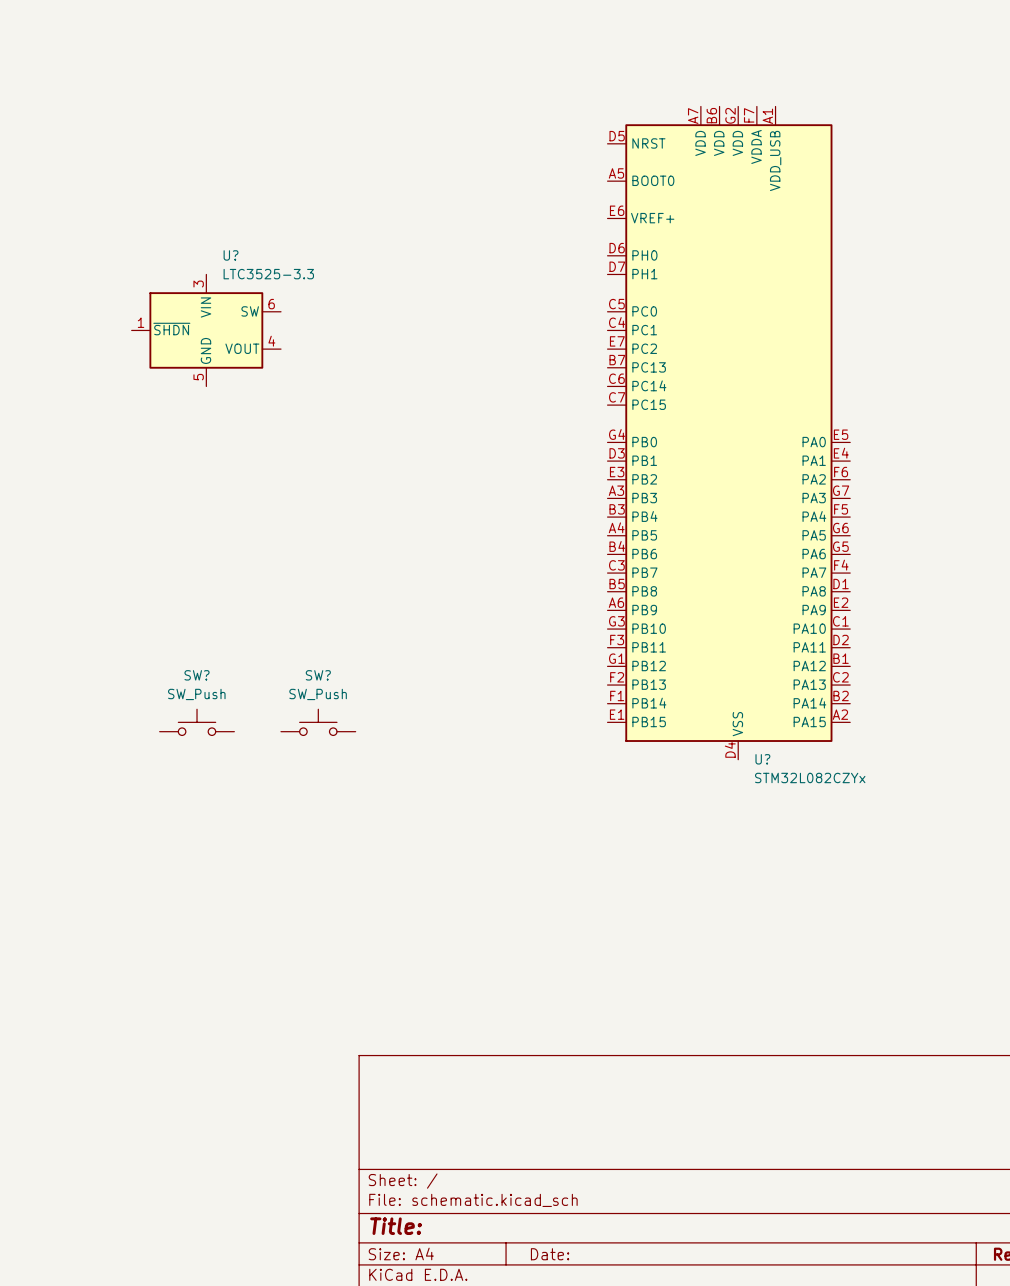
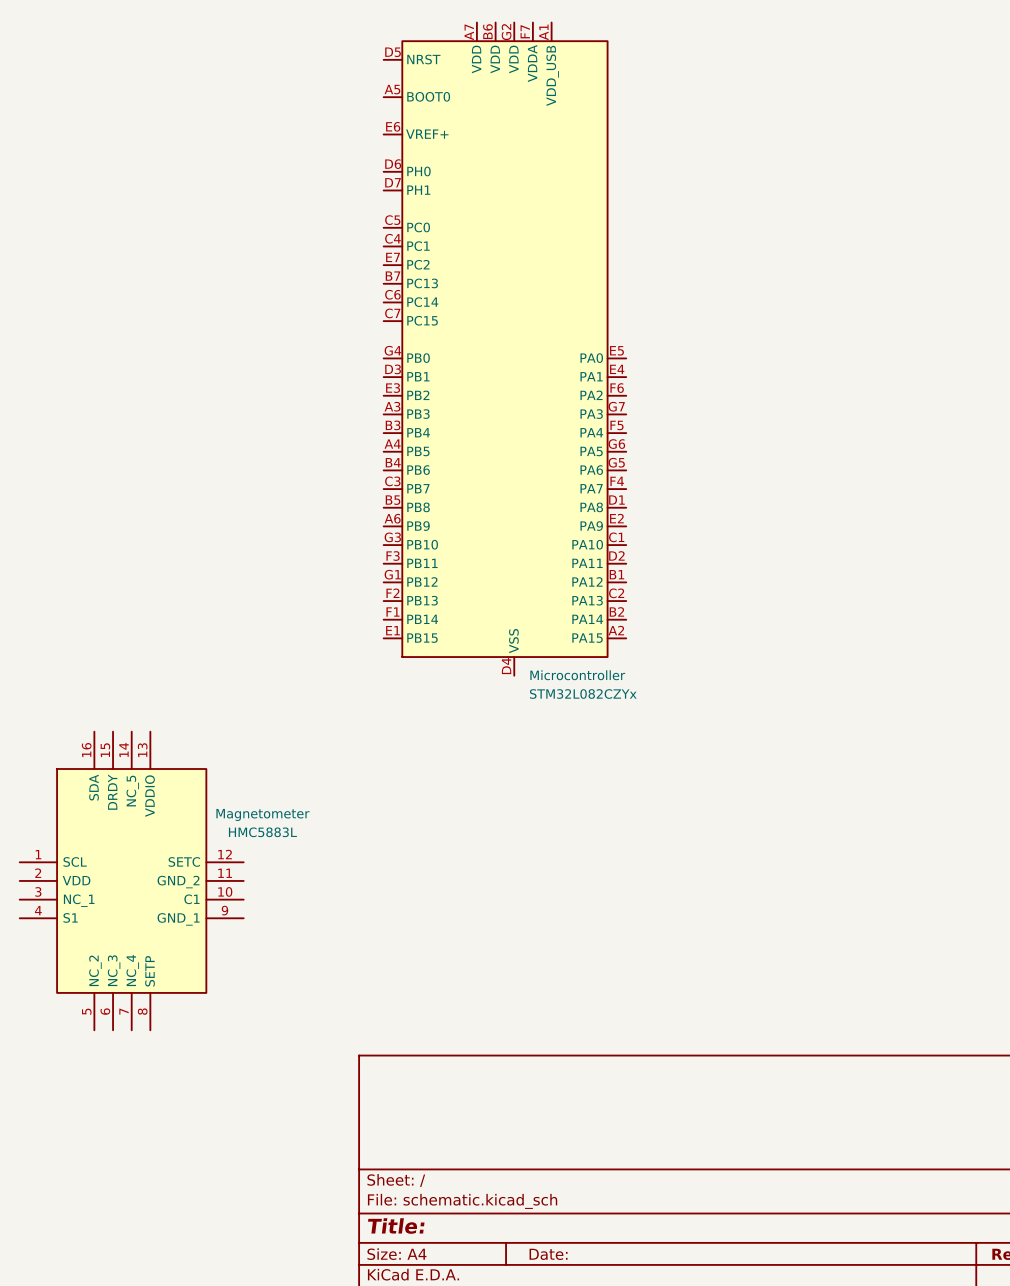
U?: LTC3525-3.3 (206, 330) -> none
Microcontroller: none -> STM32L082CZYx (504, 349)
U?: STM32L082CZYx (728, 433) -> none
SW?: SW_Push (197, 722) -> none
SW?: SW_Push (318, 722) -> none
Magnetometer: none -> HMC5883L (131, 880)

